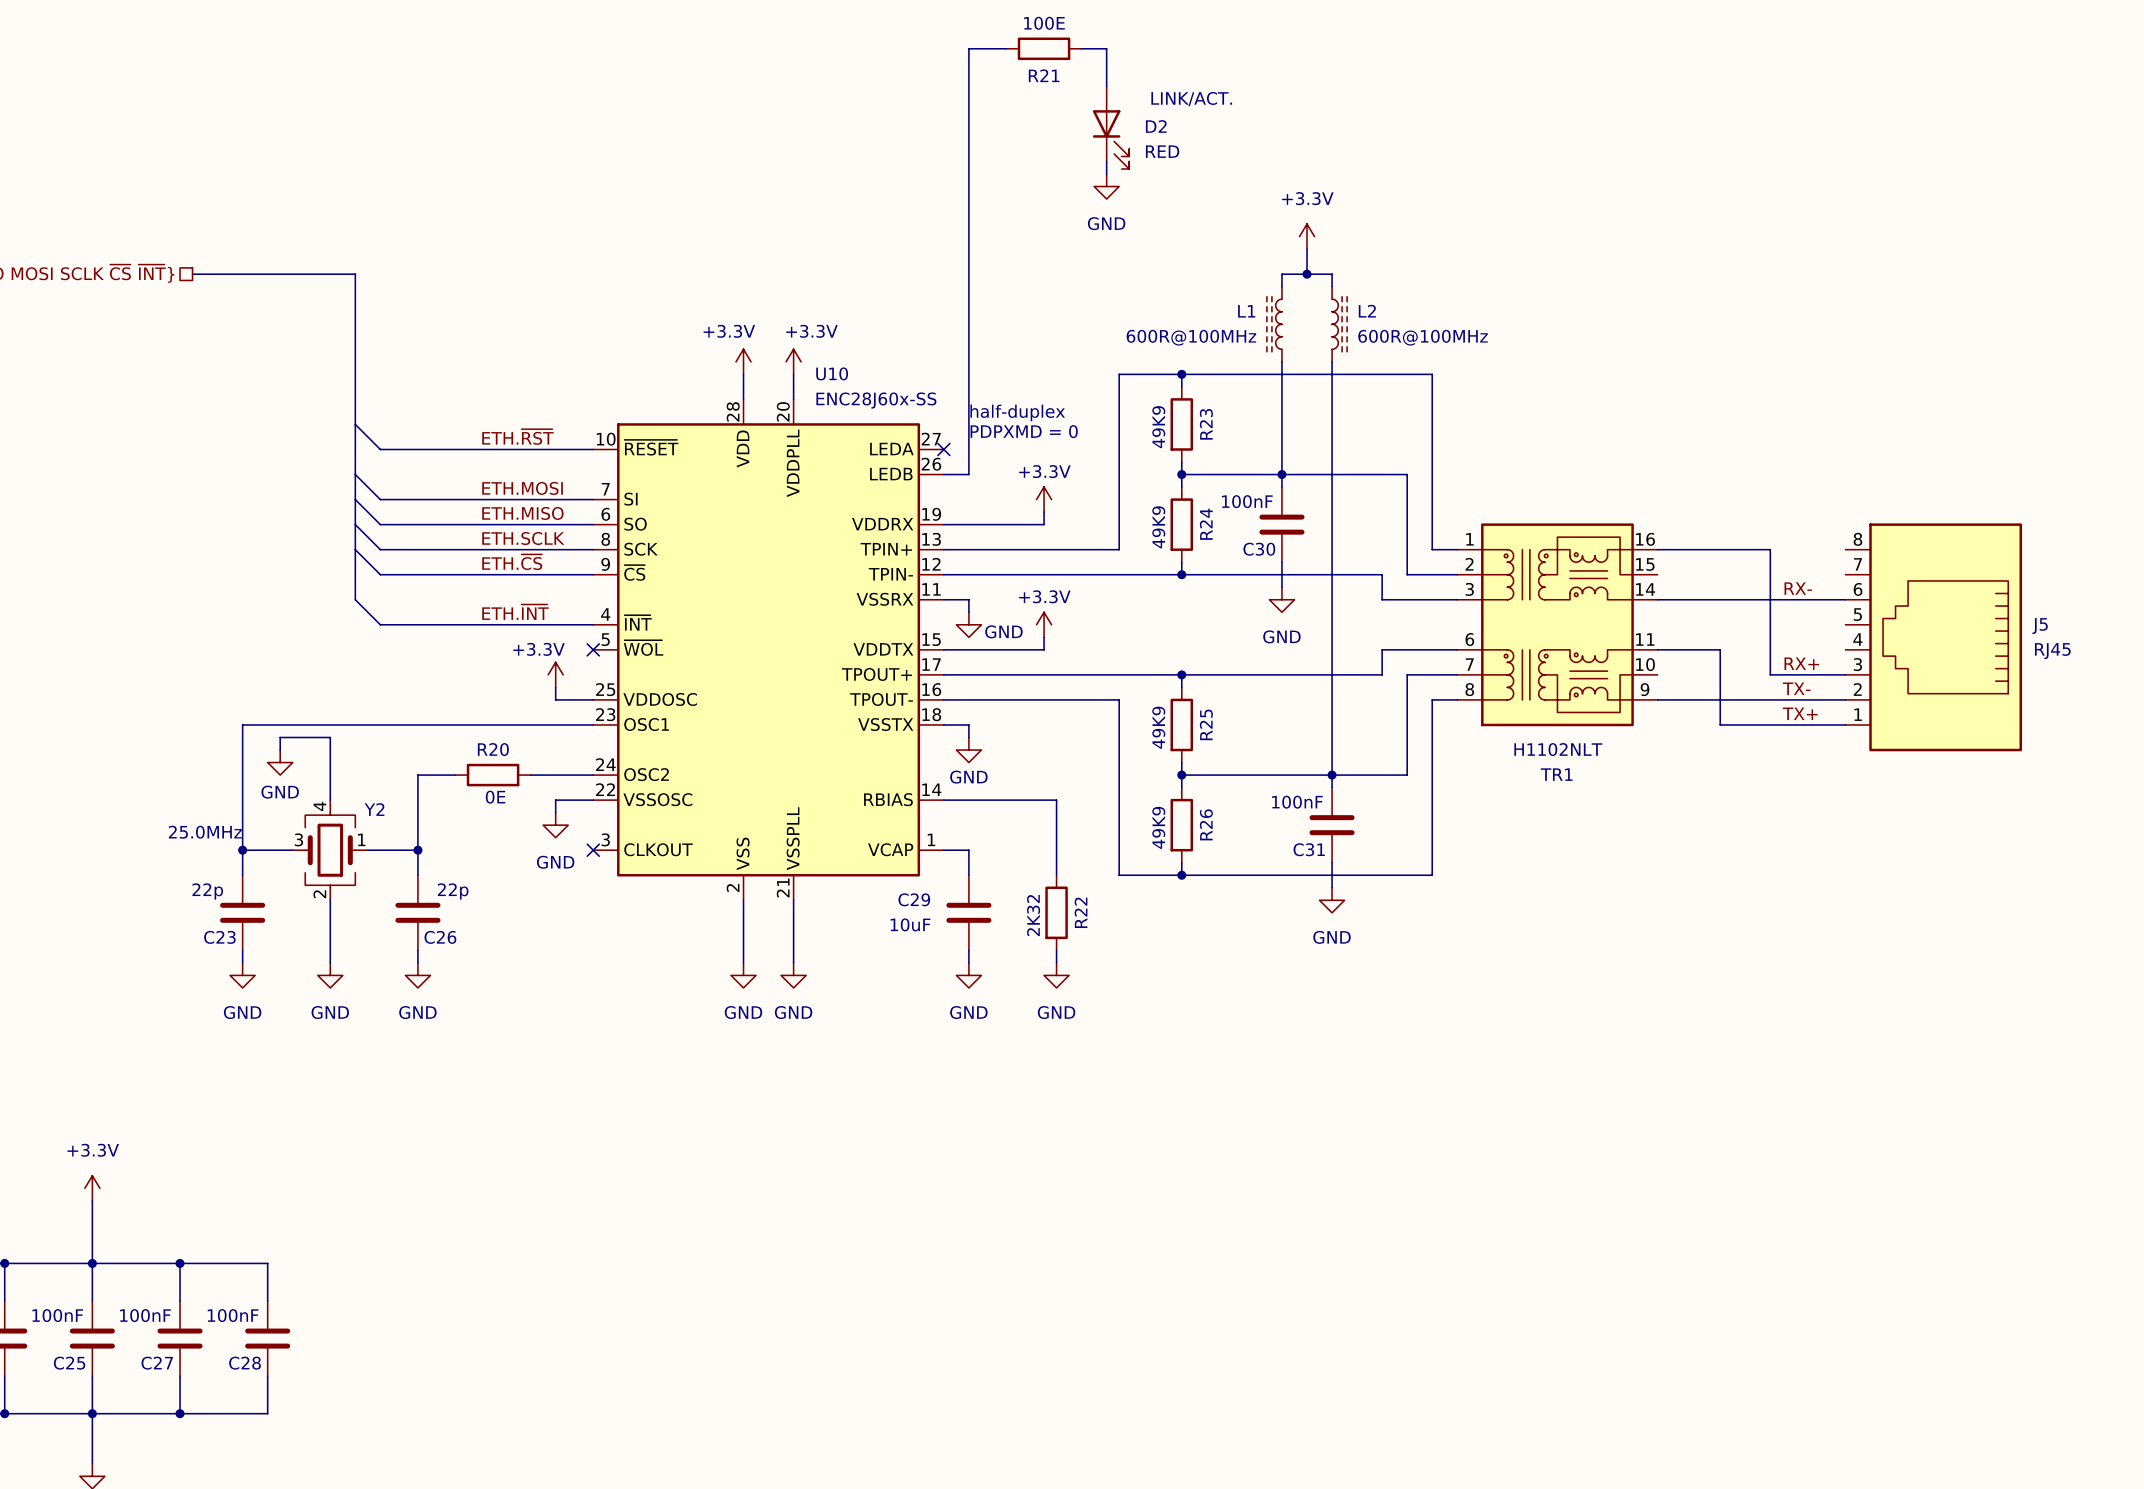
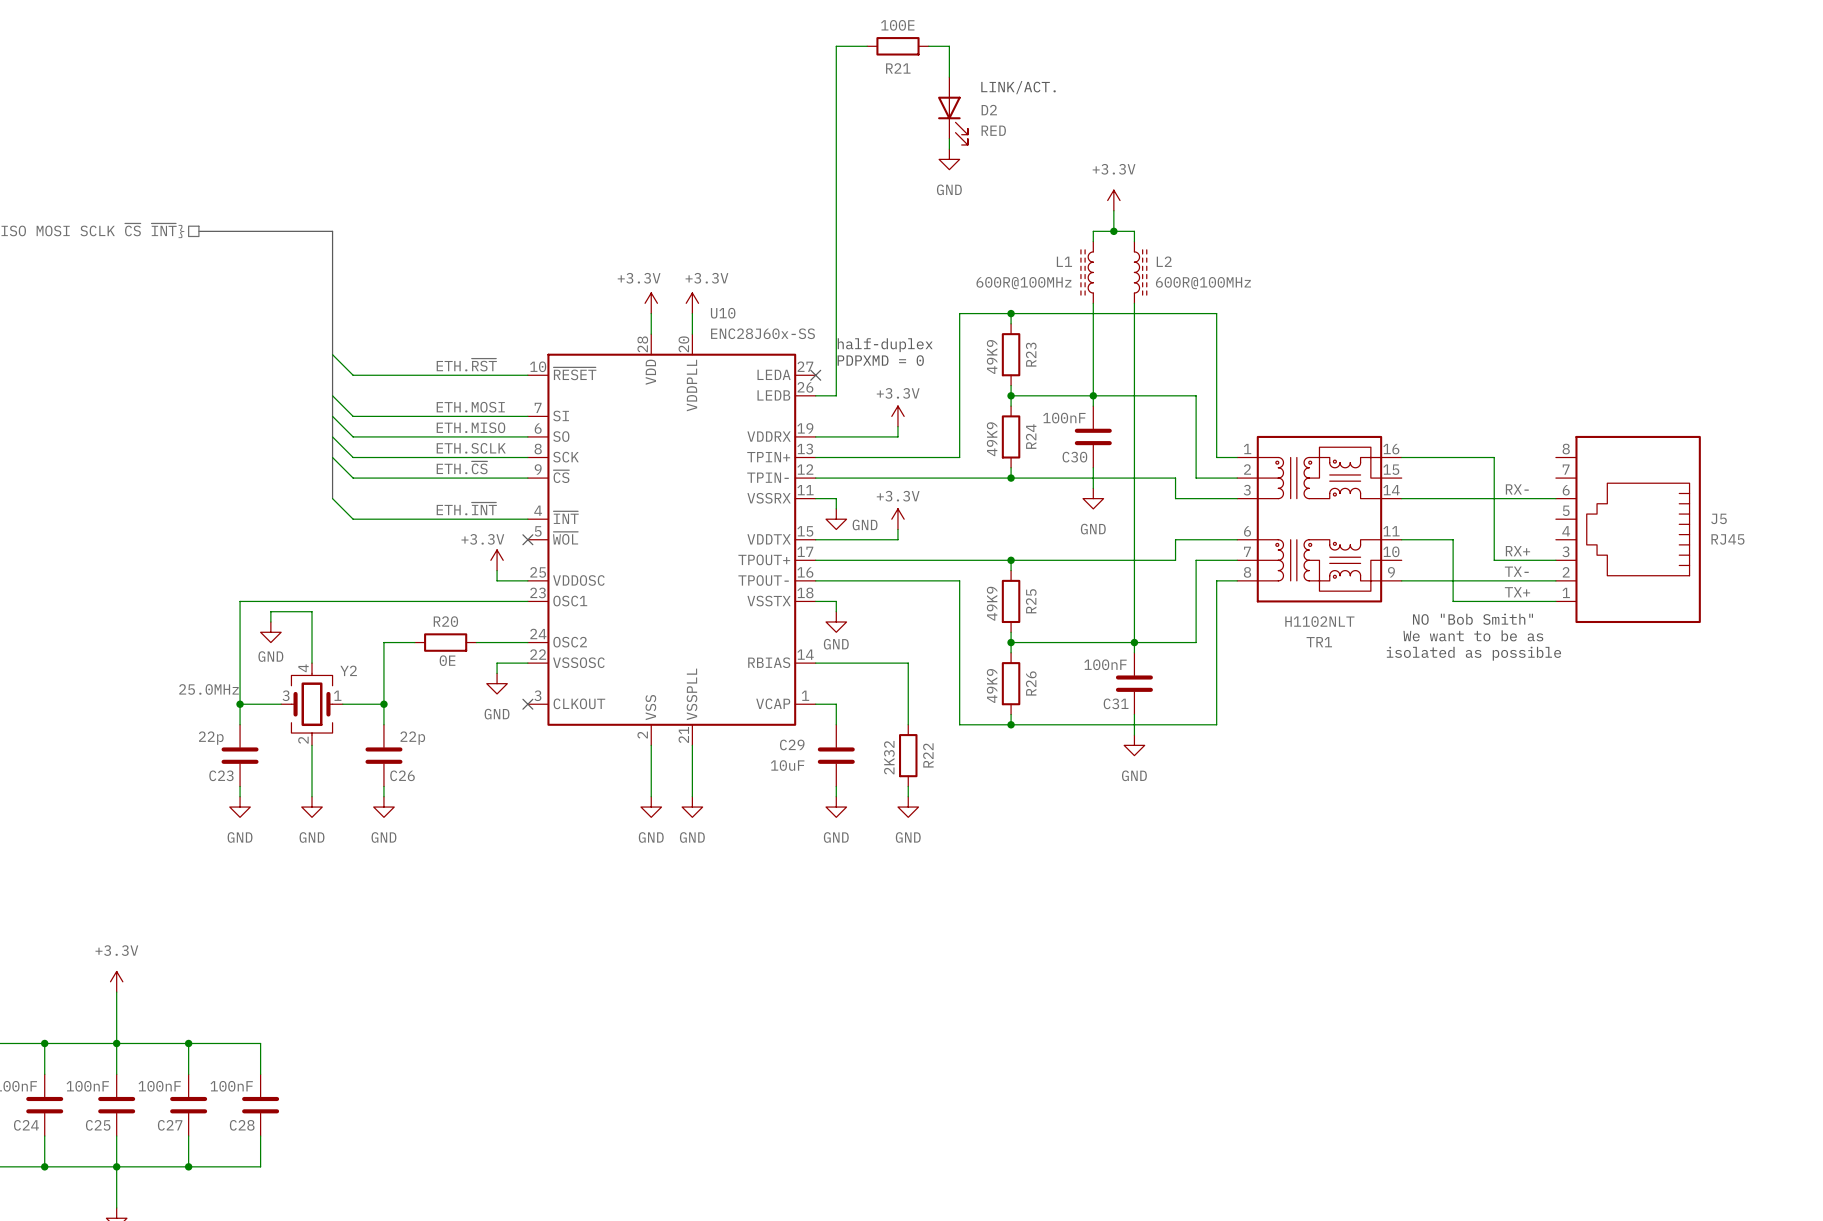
text: none -> NO "Bob Smith" (1472, 619)
text: none -> We want to be as (1473, 635)
text: none -> isolated as possible (1473, 653)

